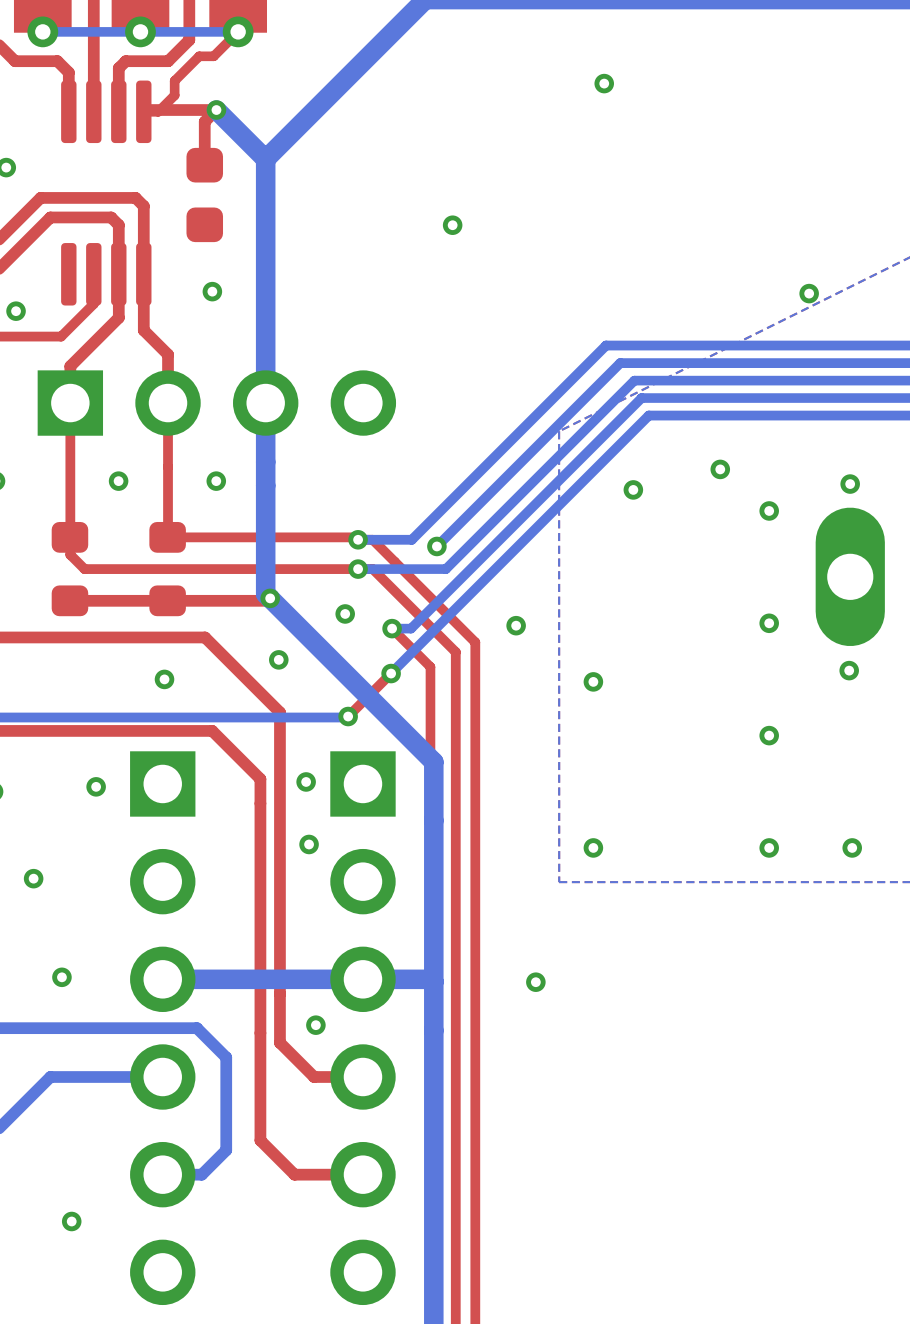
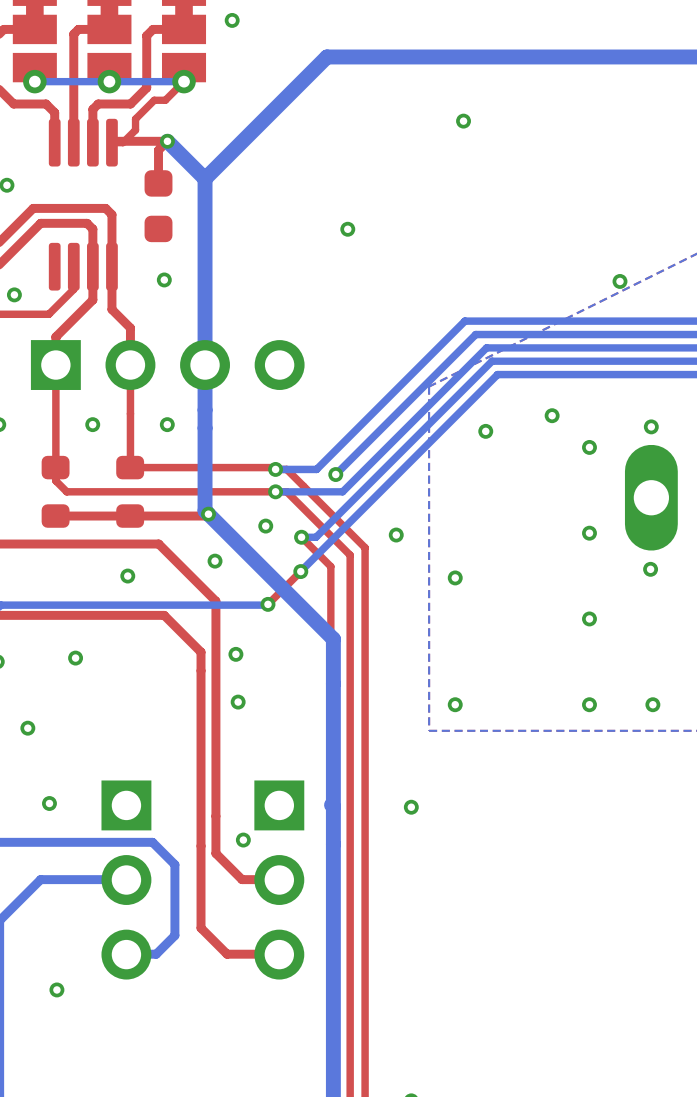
bottom track: (431, 979) (162, 979) -> none
part: (162, 1028) -> none
part: (362, 1028) -> none
part: none -> (126, 880)
part: none -> (279, 880)

